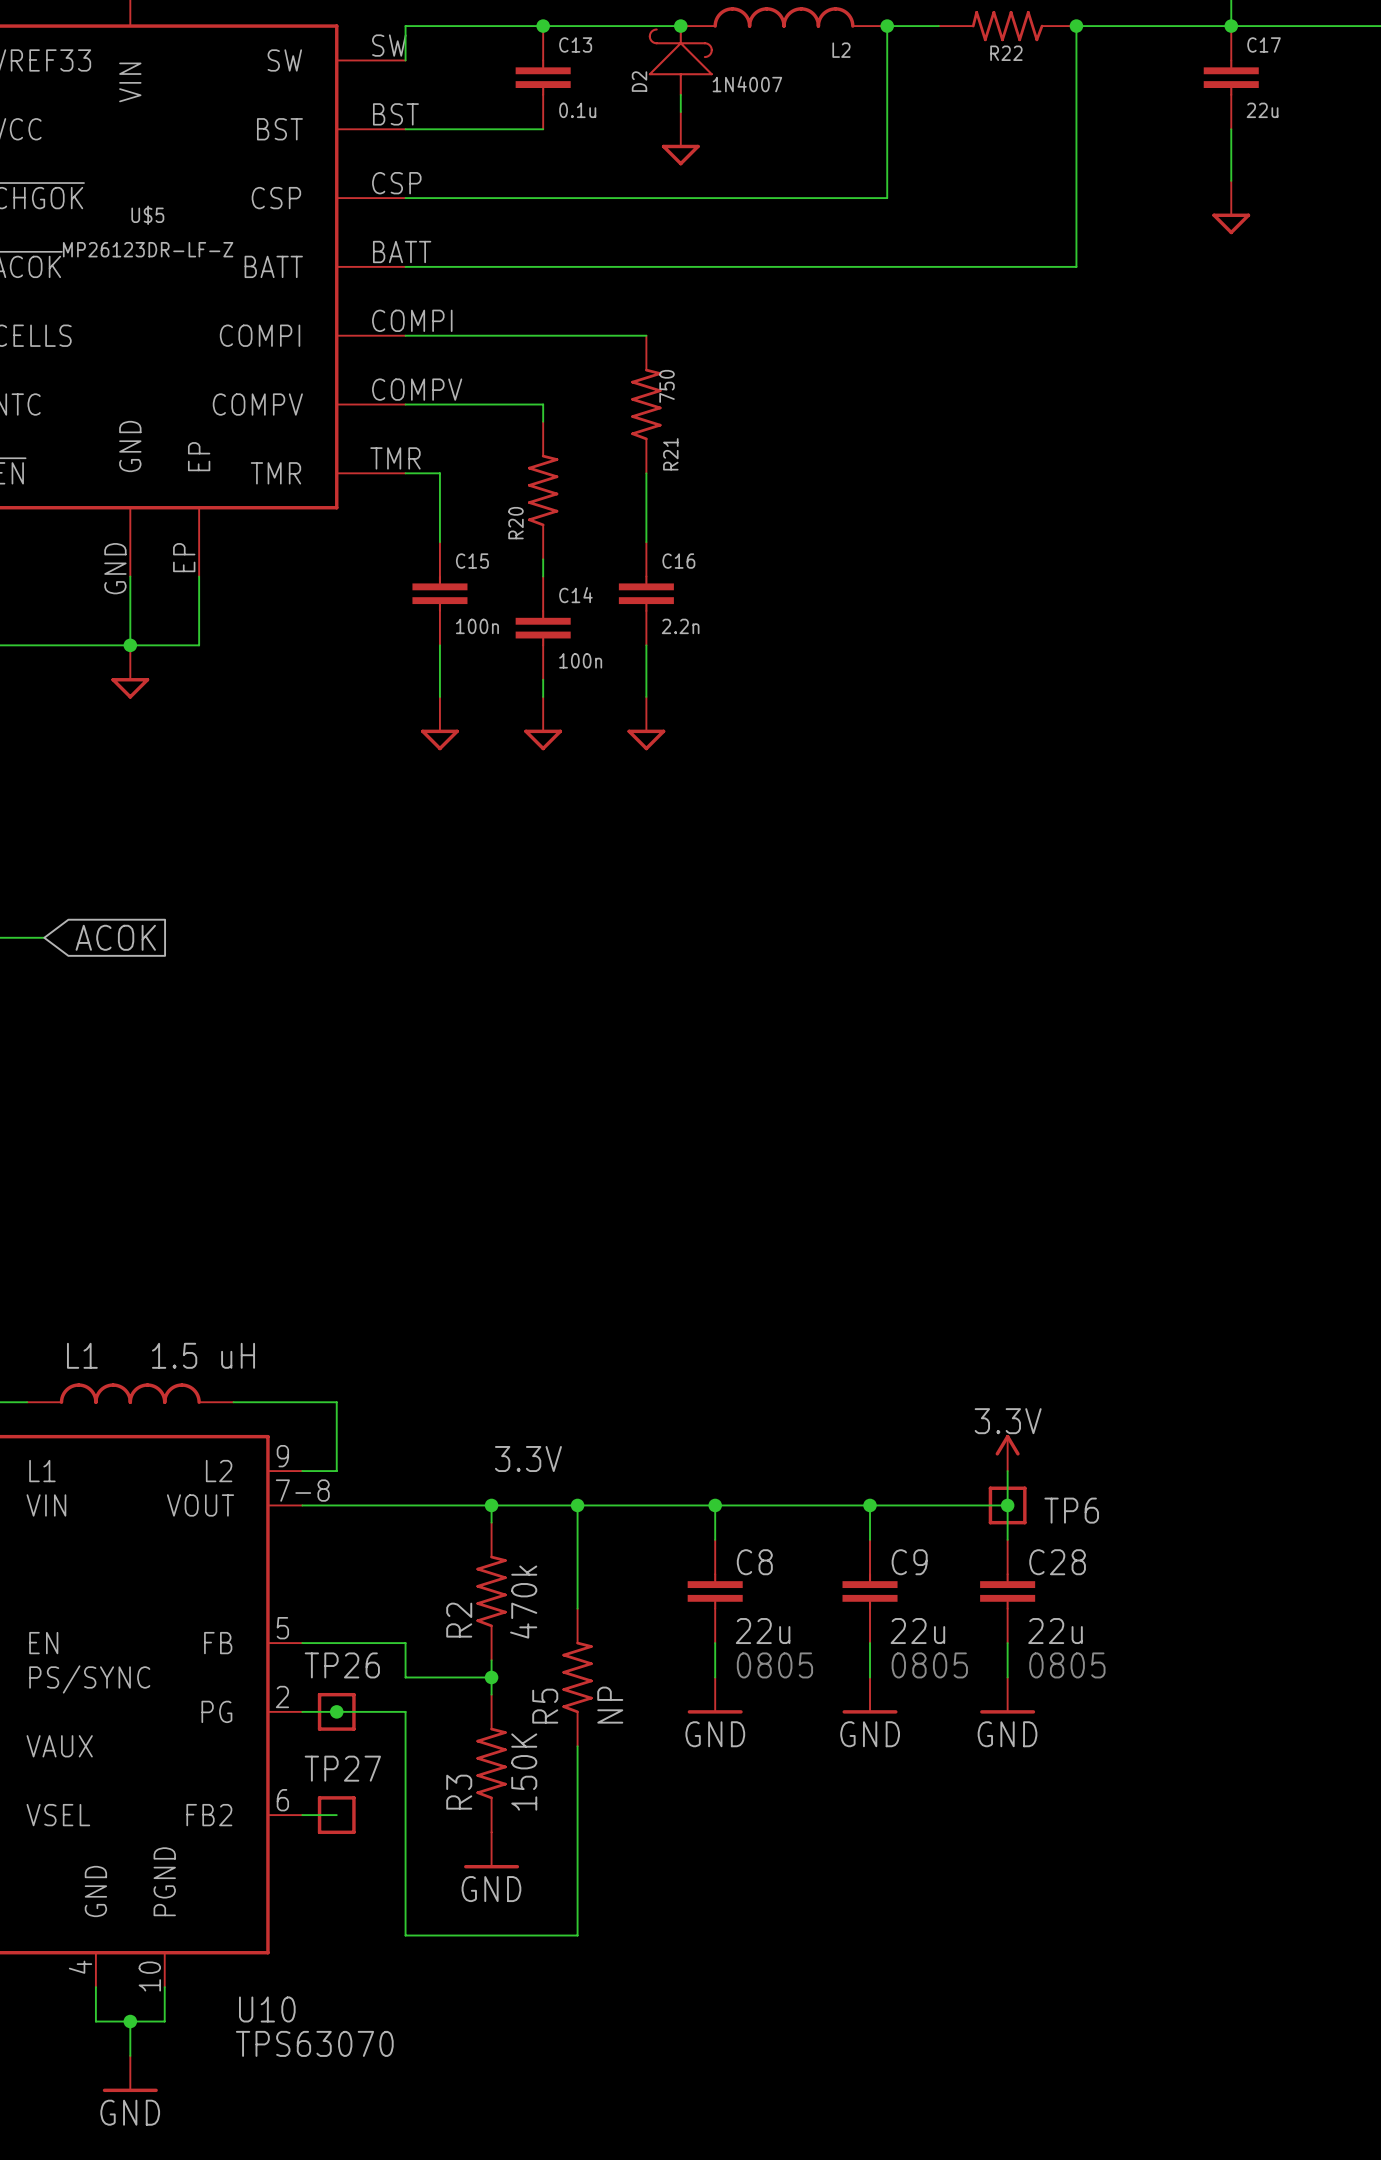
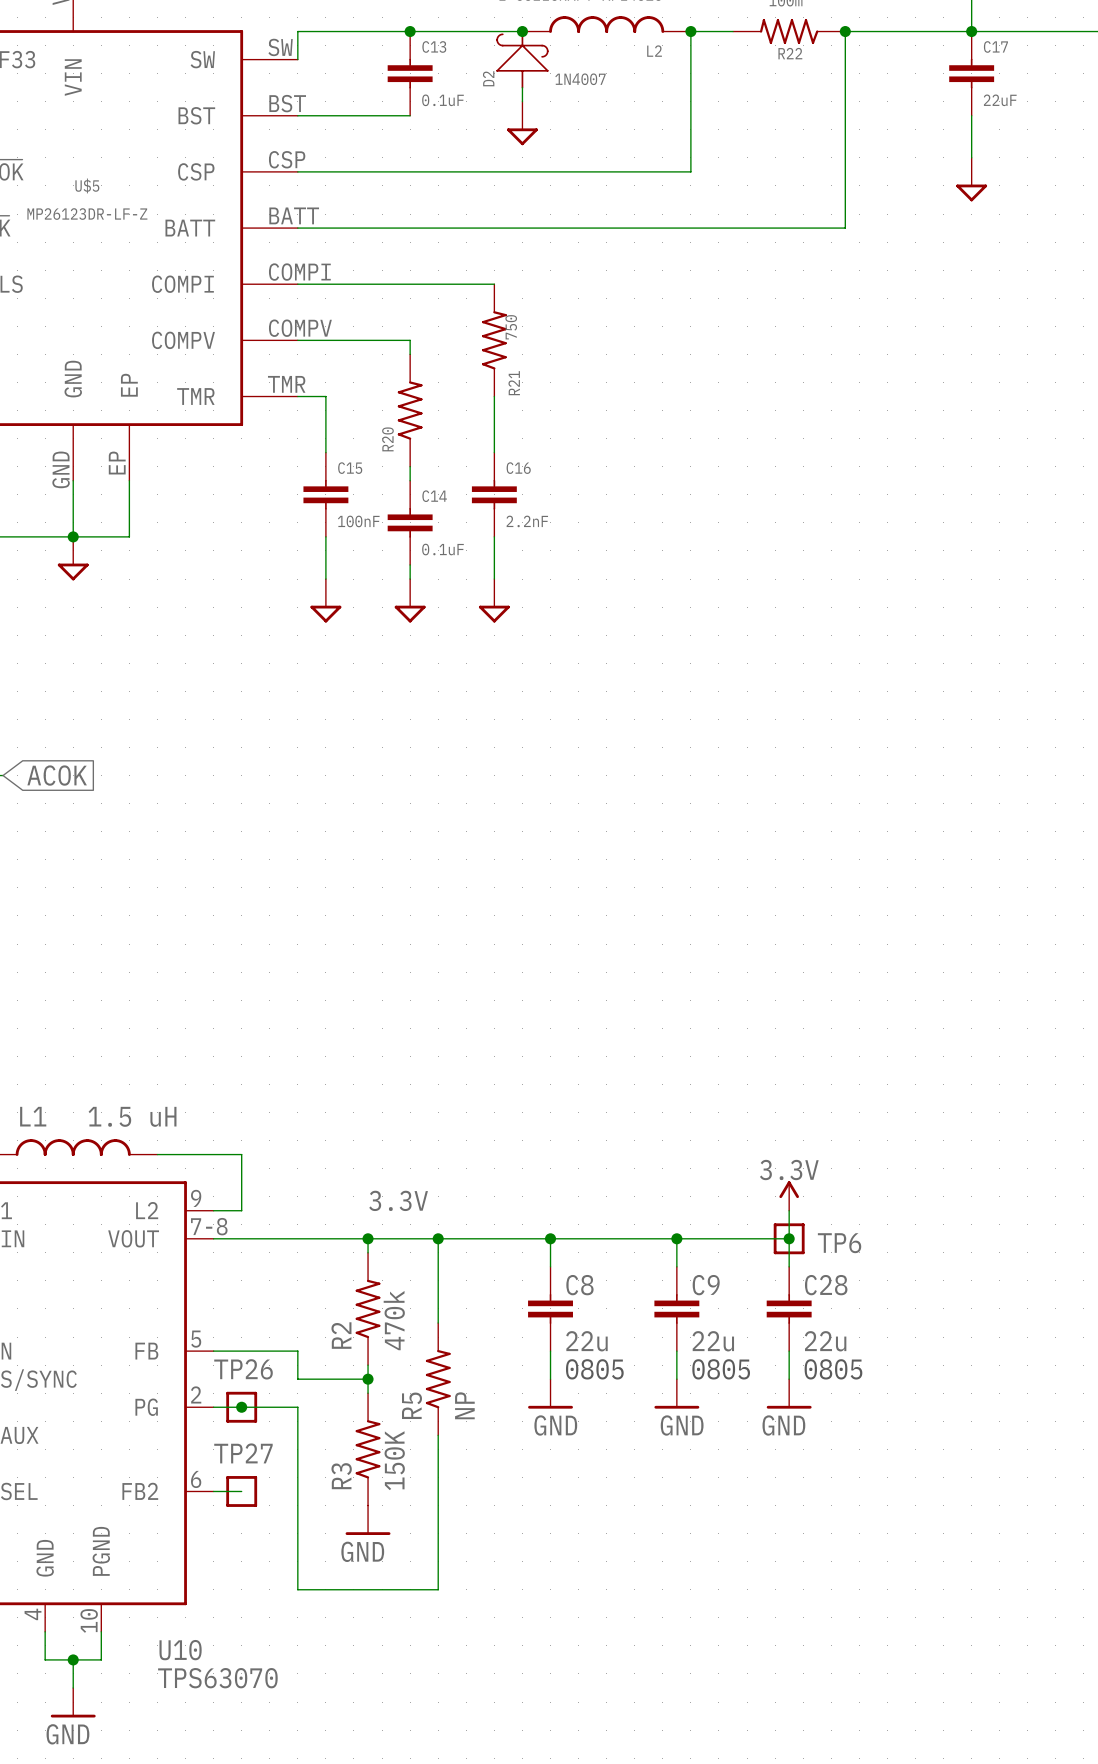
C13 value: 0.1u (577, 110) -> 0.1uF (442, 100)
C17 value: 22u (1262, 110) -> 22uF (1000, 100)
C15 value: 100n (477, 626) -> 100nF (358, 521)
C16 value: 2.2n (680, 626) -> 2.2nF (527, 521)
C14 value: 100n (580, 660) -> 0.1uF (442, 549)

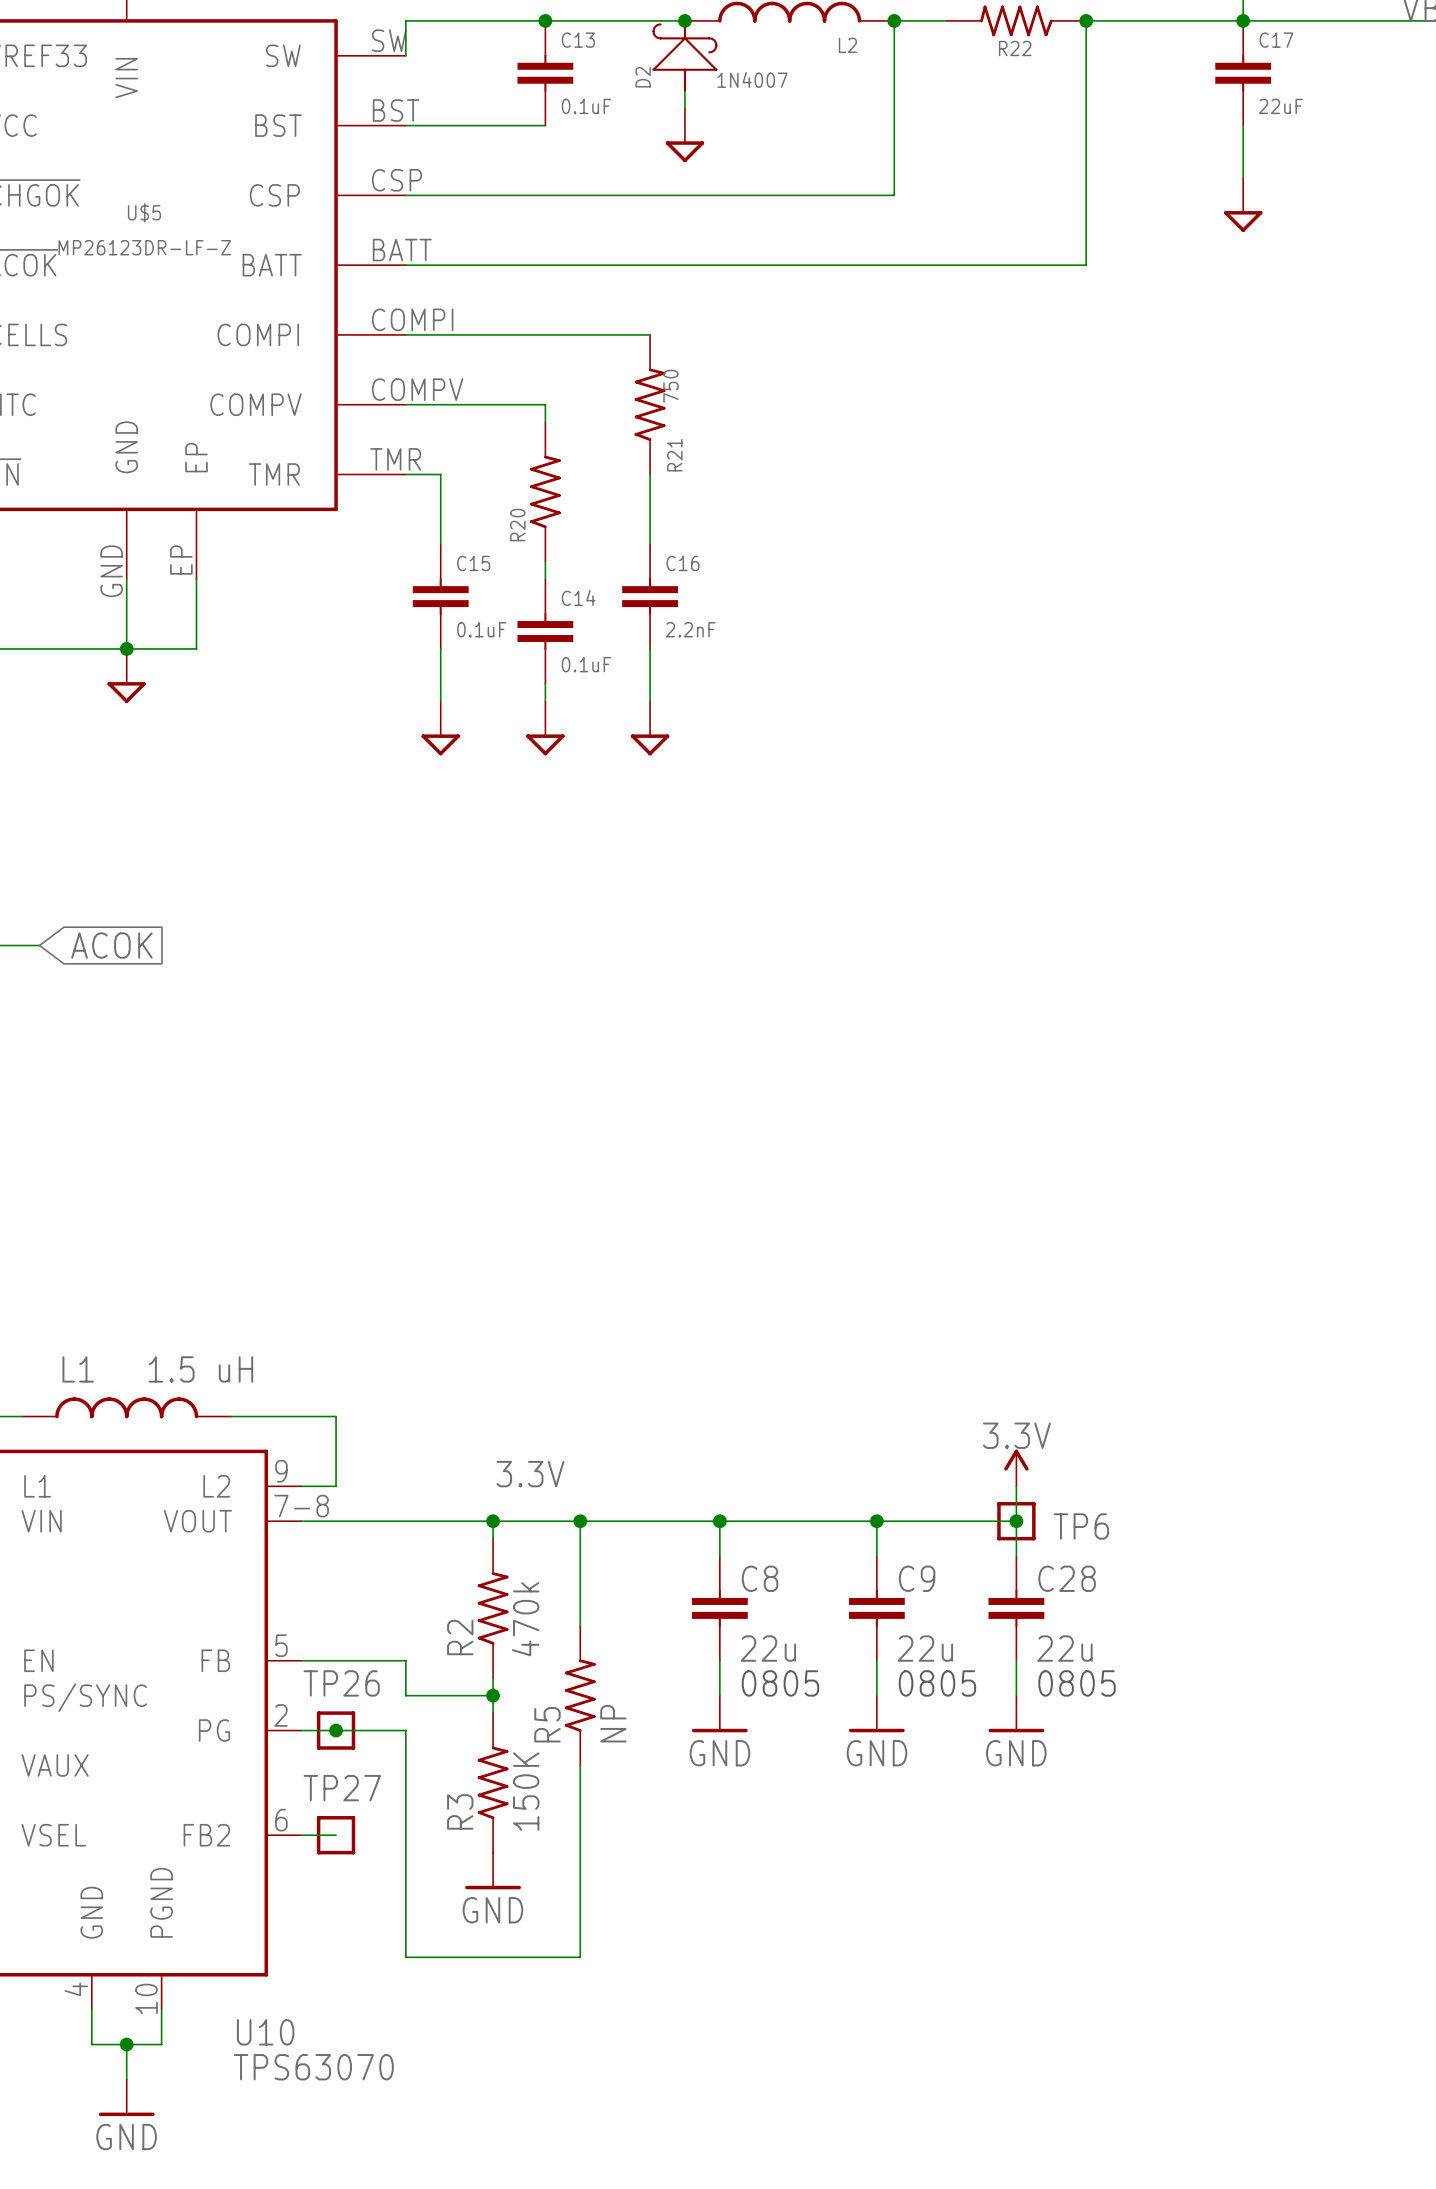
C15 value: 100nF (358, 521) -> 0.1uF (481, 629)

